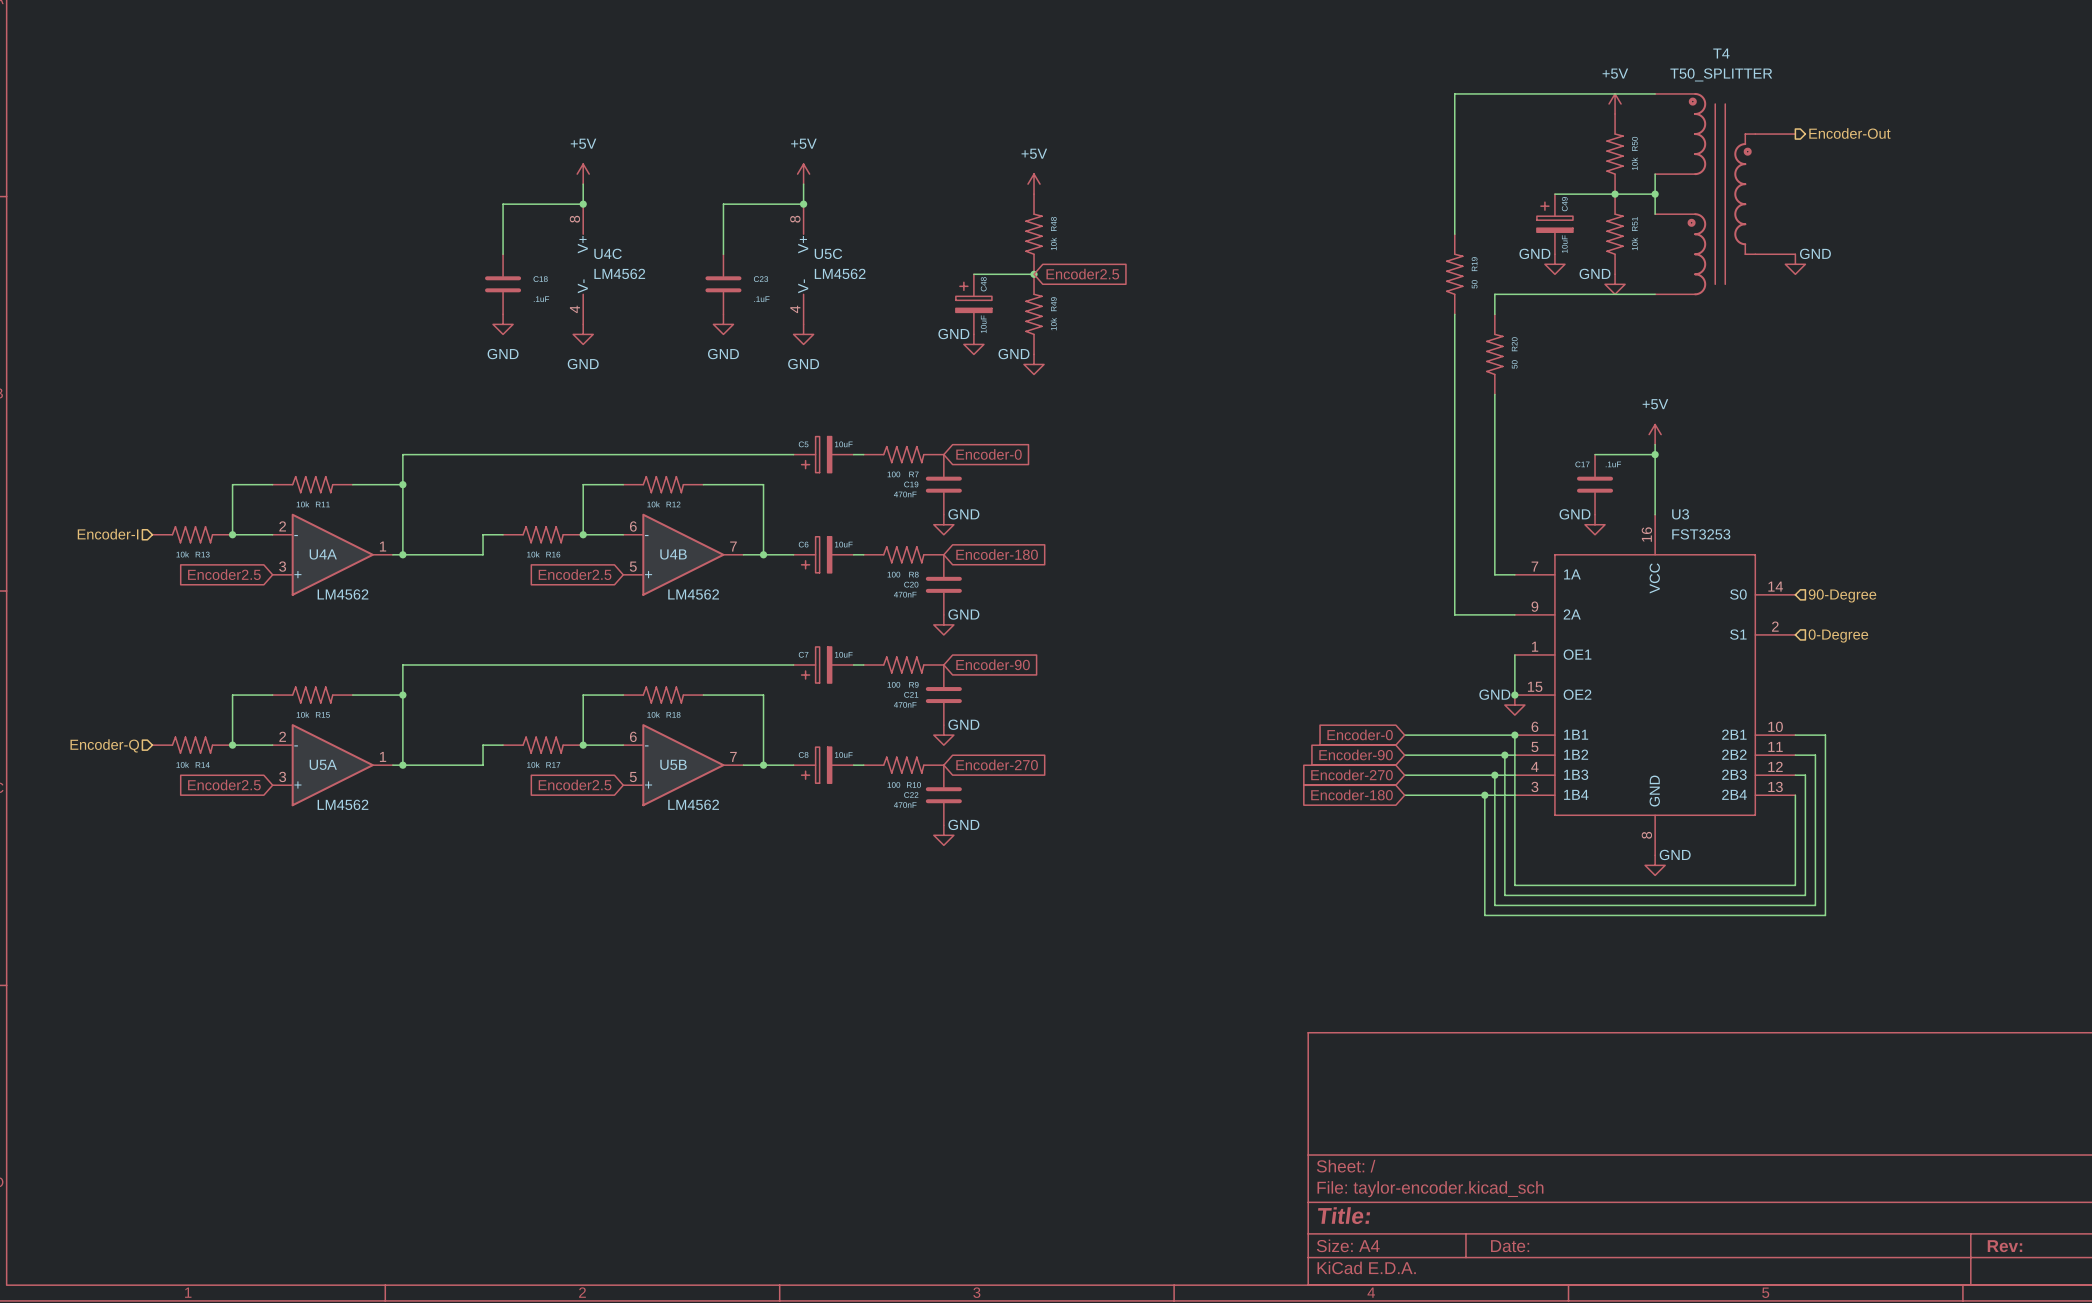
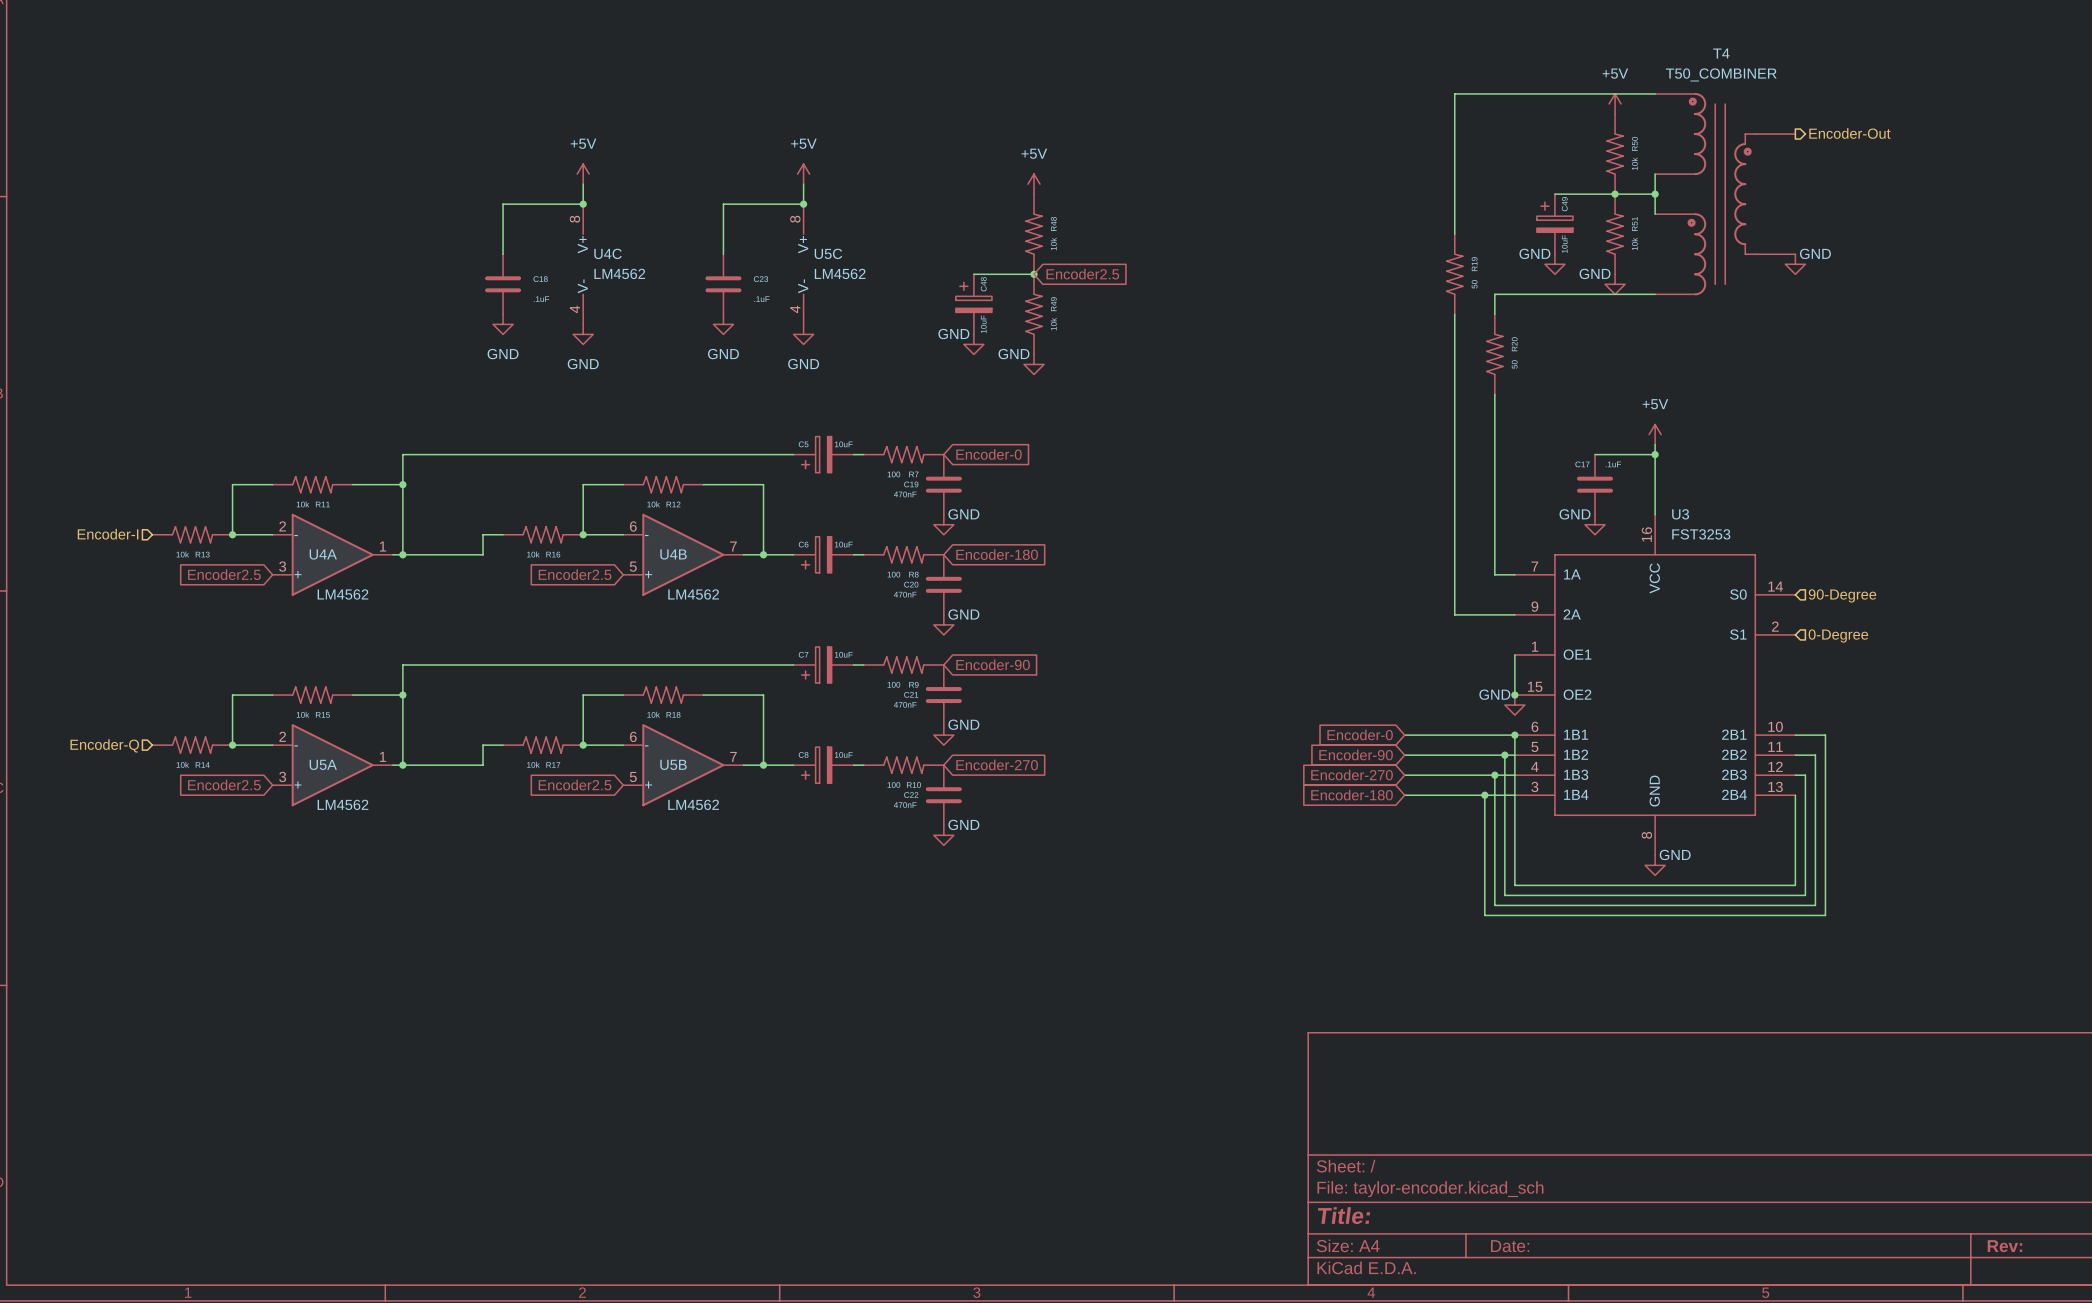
T4 value: T50_SPLITTER (1721, 74) -> T50_COMBINER (1721, 74)

